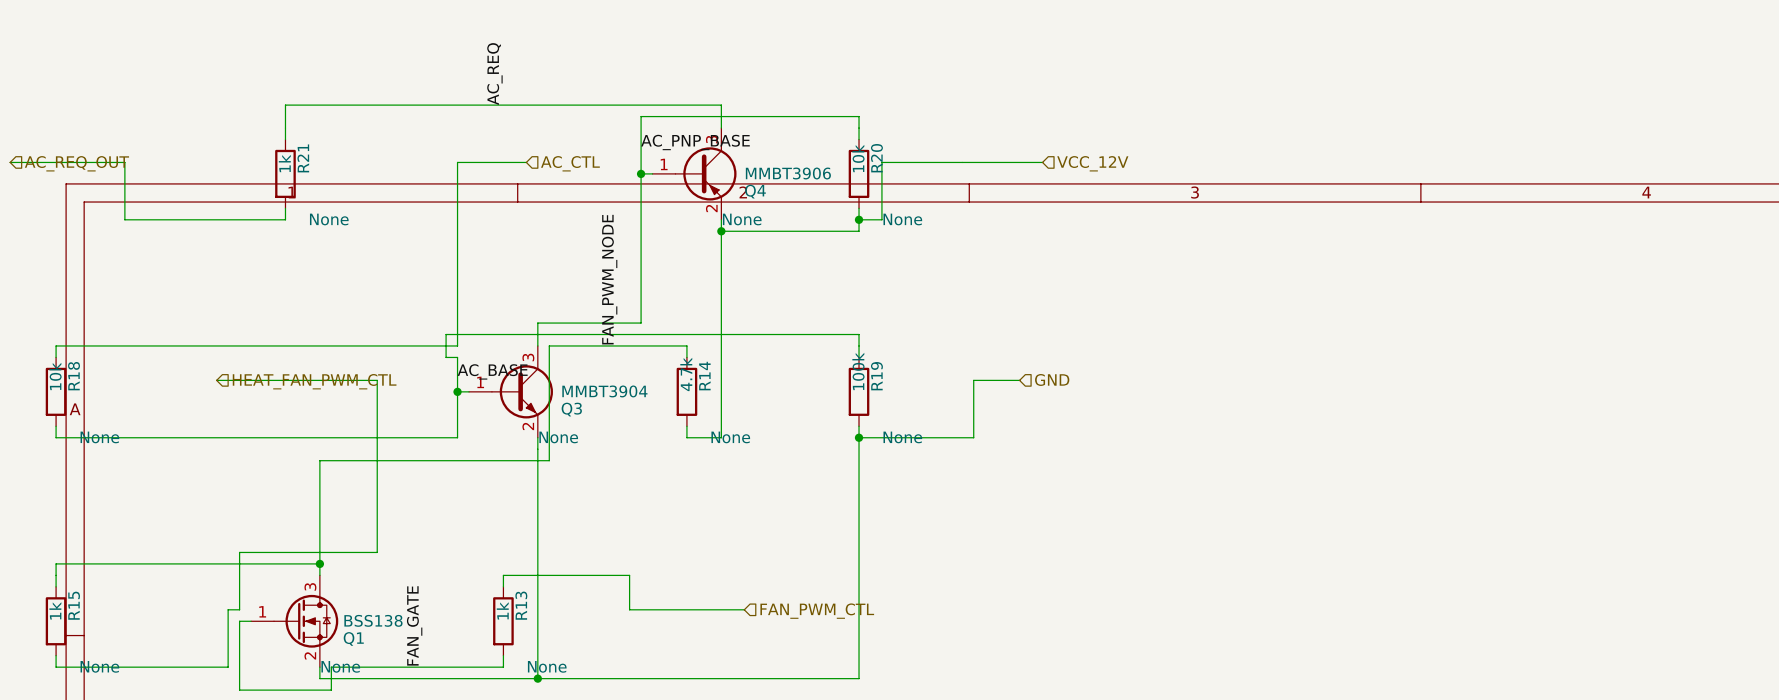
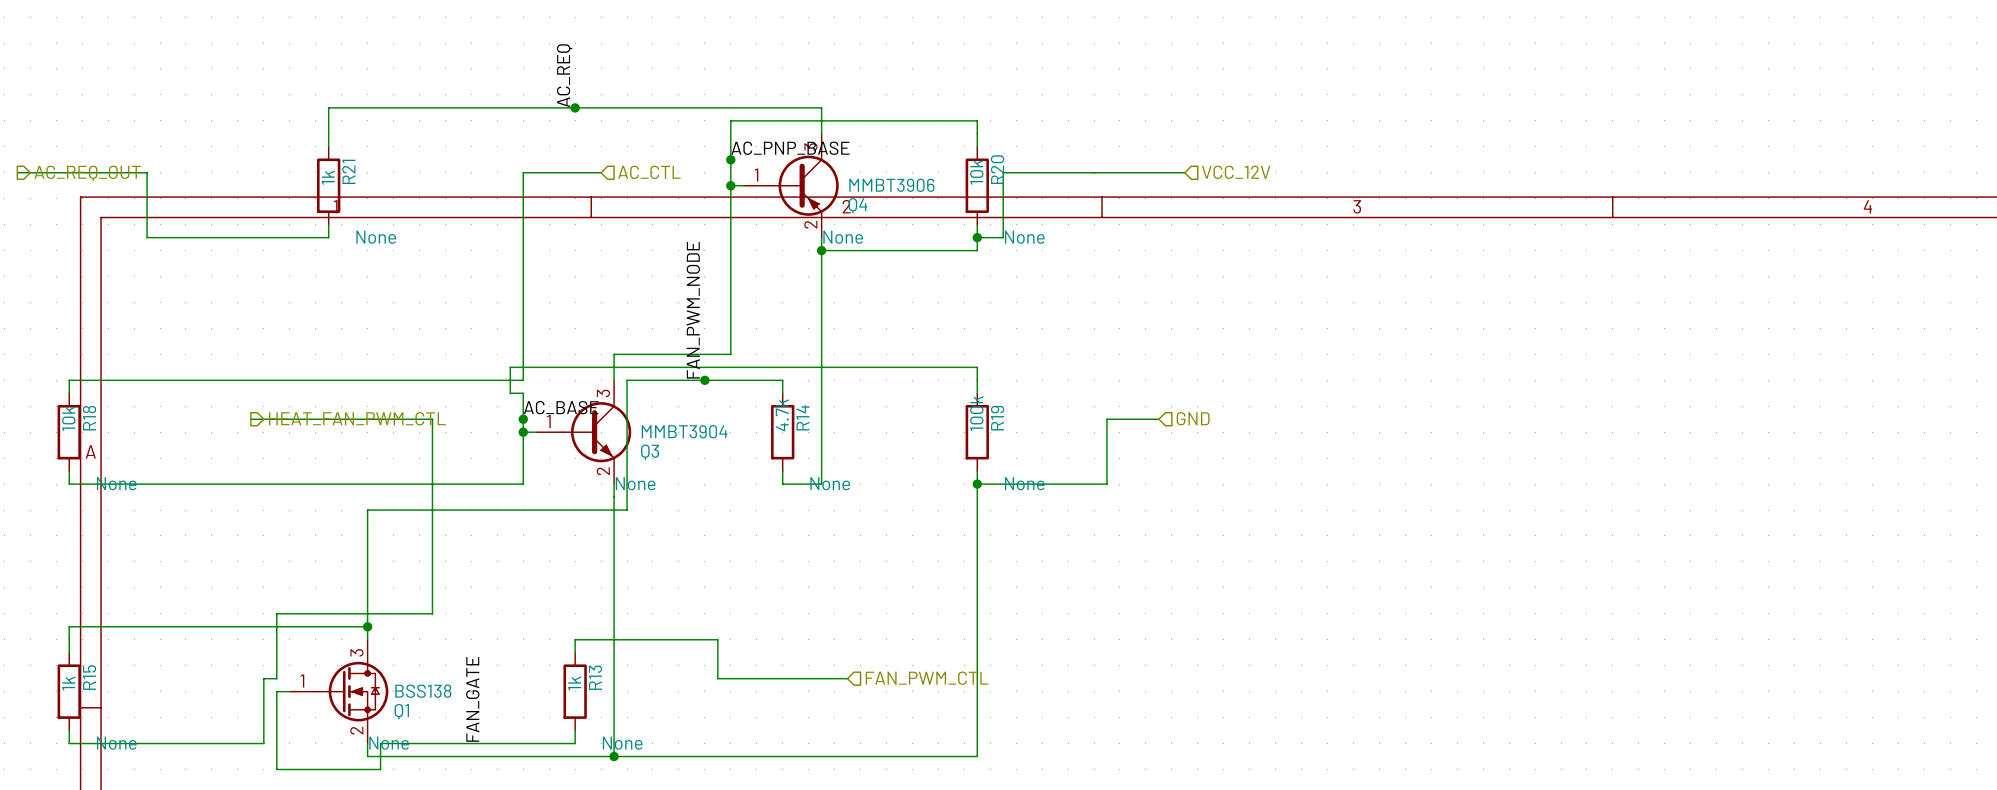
junction: none -> (575, 107)
junction: none -> (730, 159)
hierarchical label shape: input (76, 163) -> output (87, 173)
junction: none -> (704, 380)
junction: none -> (523, 419)
hierarchical label shape: input (314, 381) -> output (357, 418)

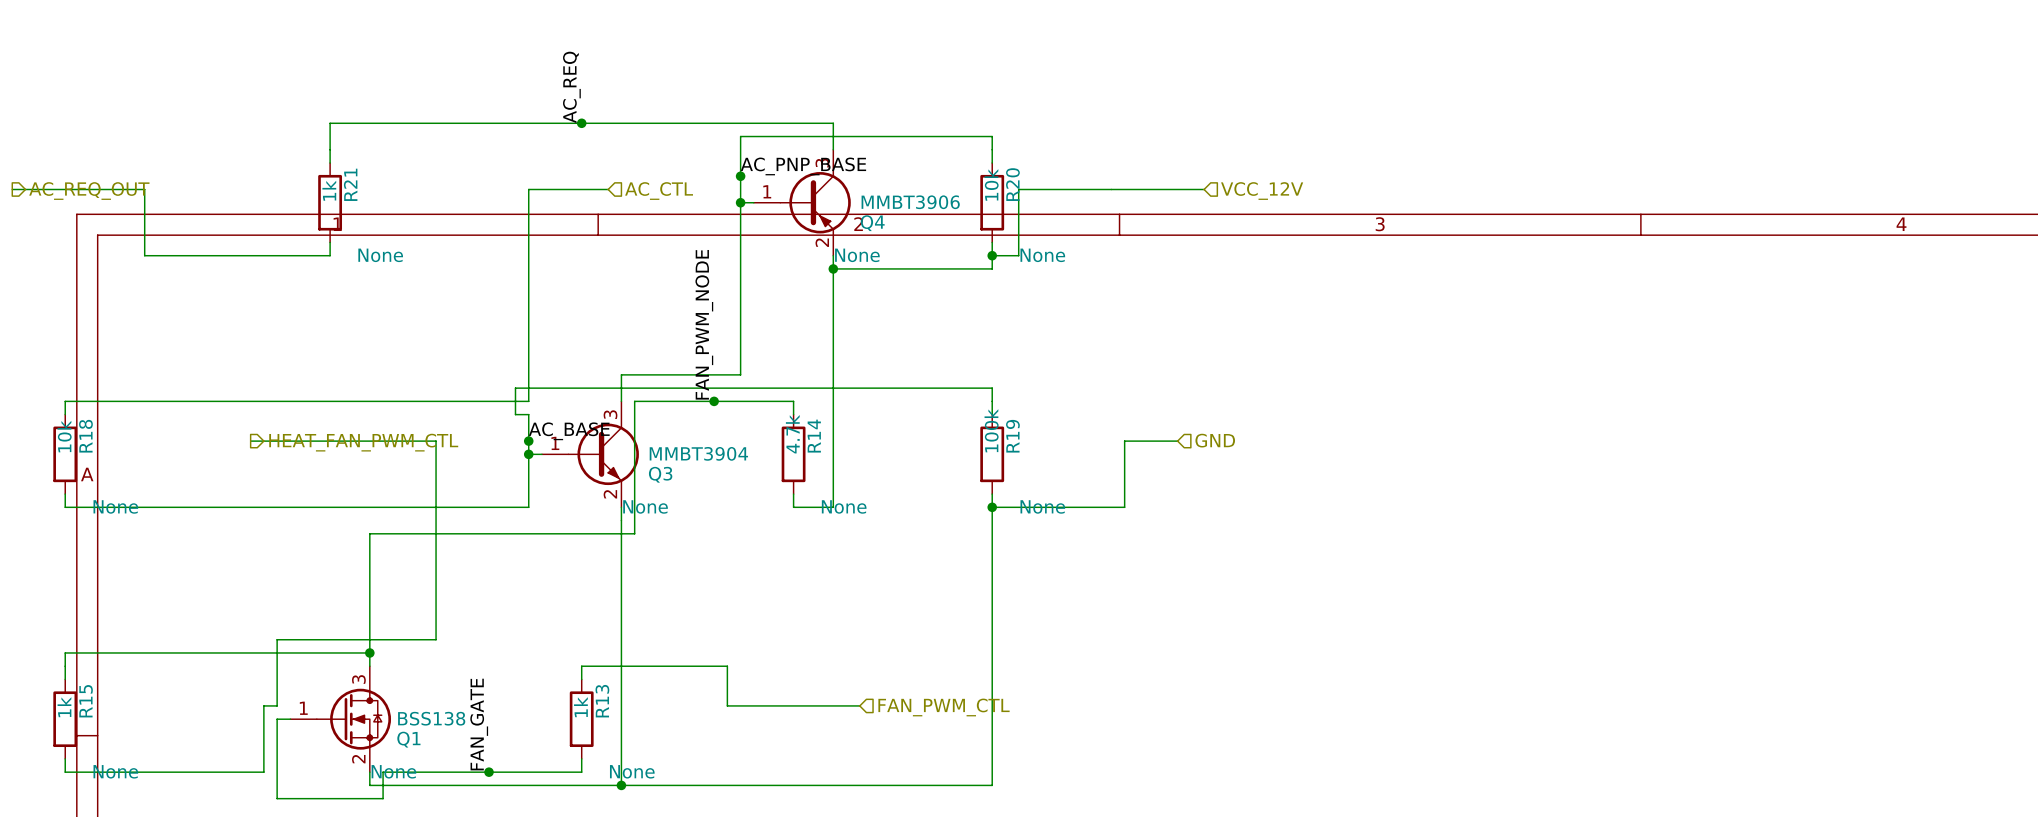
junction: none -> (489, 772)

